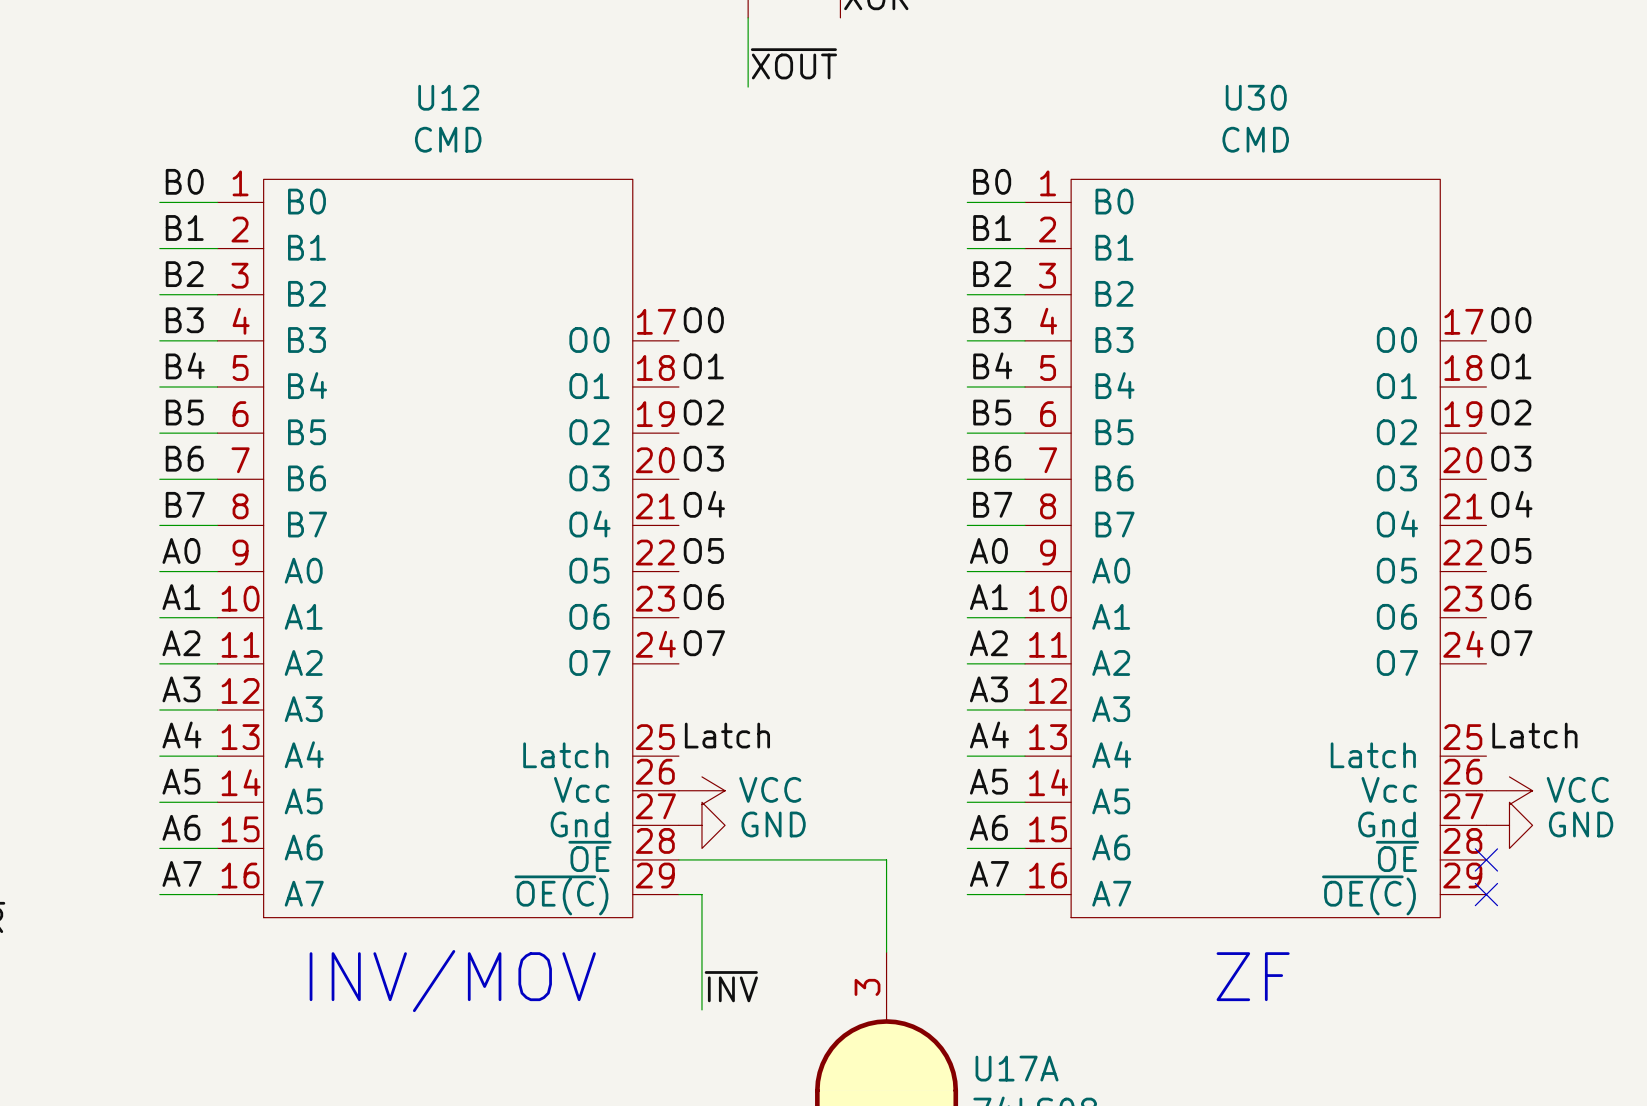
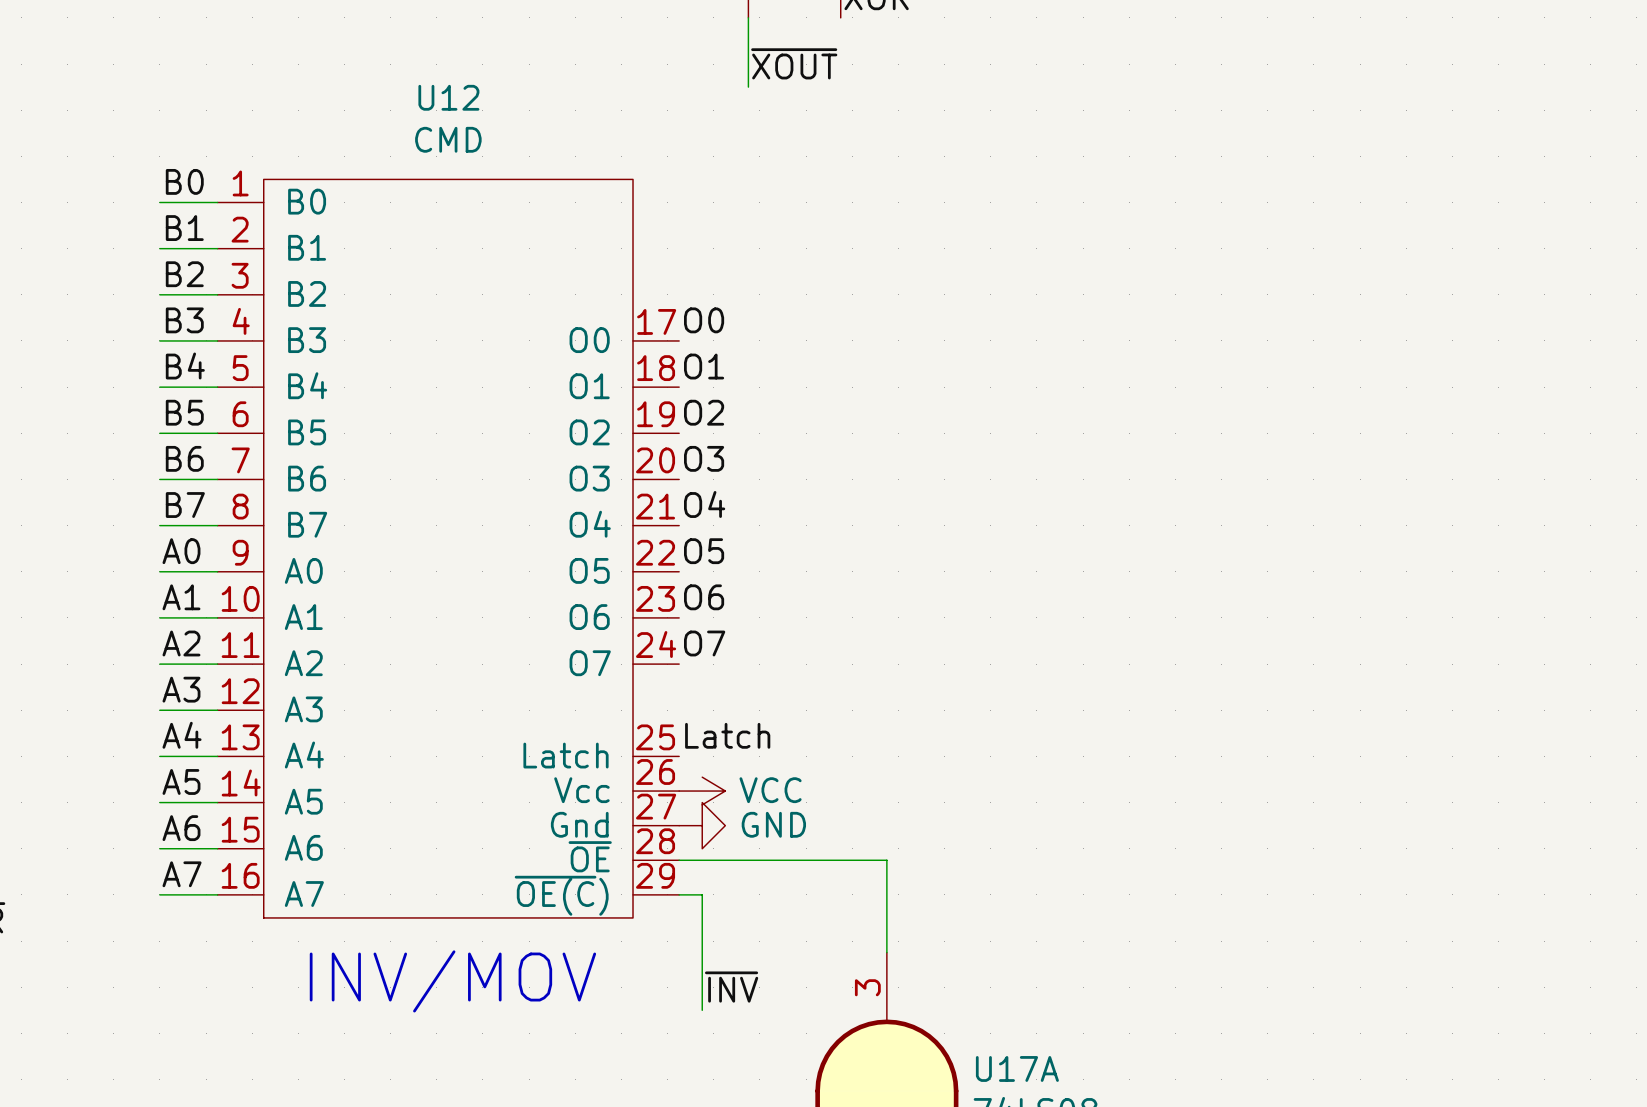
label: B0 (992, 181) -> none
wire: (967, 202) (1024, 202) -> none
label: B1 (992, 227) -> none
wire: (967, 248) (1024, 248) -> none
label: B2 (992, 274) -> none
wire: (967, 294) (1024, 294) -> none
label: B3 (992, 320) -> none
label: O0 (1511, 320) -> none
wire: (967, 340) (1024, 340) -> none
label: B4 (992, 365) -> none
label: O1 (1511, 366) -> none
wire: (967, 386) (1024, 386) -> none
label: B5 (992, 412) -> none
label: O2 (1511, 412) -> none
wire: (967, 433) (1024, 433) -> none
label: B6 (992, 458) -> none
label: O3 (1511, 458) -> none
wire: (967, 479) (1024, 479) -> none
label: B7 (992, 504) -> none
label: O4 (1511, 504) -> none
wire: (967, 525) (1024, 525) -> none
U30: CMD (1255, 548) -> none
label: A0 (988, 550) -> none
label: O5 (1511, 550) -> none
wire: (967, 571) (1024, 571) -> none
label: A1 (988, 597) -> none
label: O6 (1511, 597) -> none
wire: (967, 617) (1024, 617) -> none
label: A2 (988, 643) -> none
label: O7 (1511, 643) -> none
wire: (967, 663) (1024, 663) -> none
label: A3 (988, 689) -> none
wire: (967, 709) (1024, 709) -> none
label: A4 (989, 735) -> none
label: Latch (1534, 735) -> none
wire: (967, 756) (1024, 756) -> none
label: A5 (988, 781) -> none
power symbol: VCC (1509, 790) -> none
wire: (967, 802) (1024, 802) -> none
power symbol: GND (1509, 825) -> none
label: A6 (988, 827) -> none
wire: (967, 848) (1024, 848) -> none
no-connect mark: (1486, 859) -> none
label: A7 (989, 873) -> none
wire: (967, 894) (1024, 894) -> none
no-connect mark: (1486, 894) -> none
text: ZF (1253, 976) -> none

